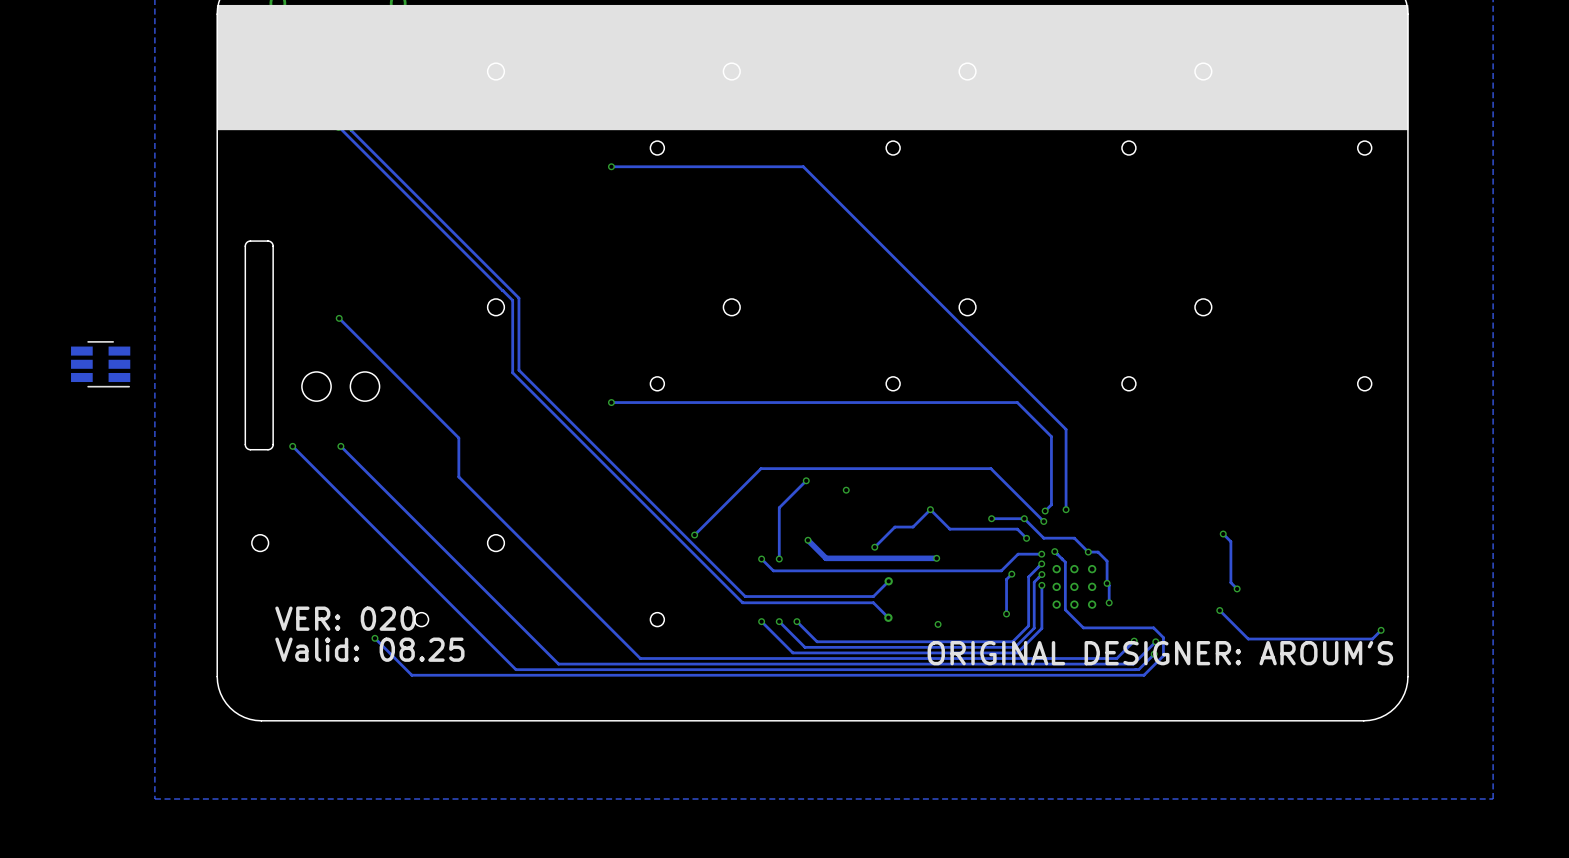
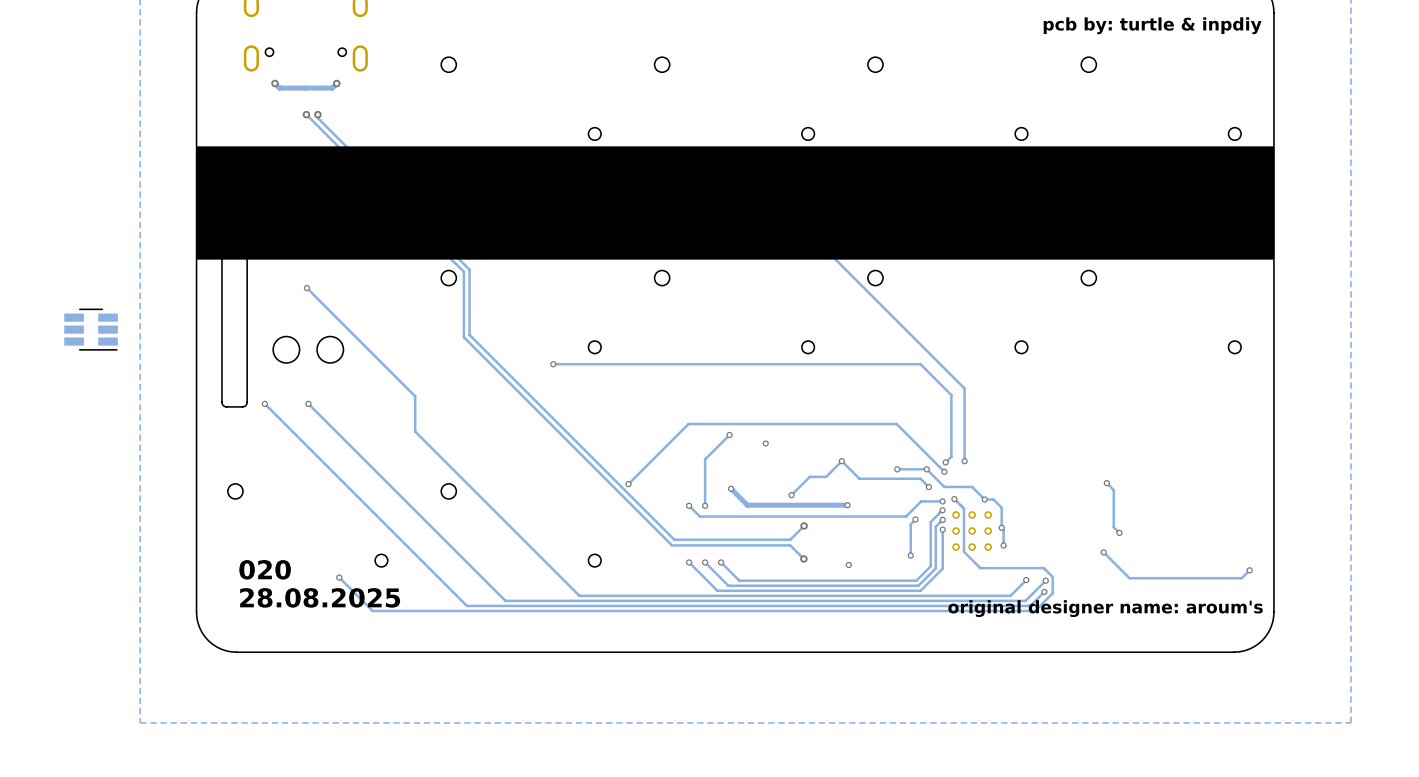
drawing position: (812, 67) -> (735, 202)
text: VER: 020 (345, 618) -> none
text: none -> 020 (265, 569)
text: Valid: 08.25 (369, 649) -> none
text: ORIGINAL DESIGNER: AROUM'S (1160, 653) -> none
text: none -> 28.08.2025 (320, 597)
text: none -> original designer name: aroum's (1105, 608)

